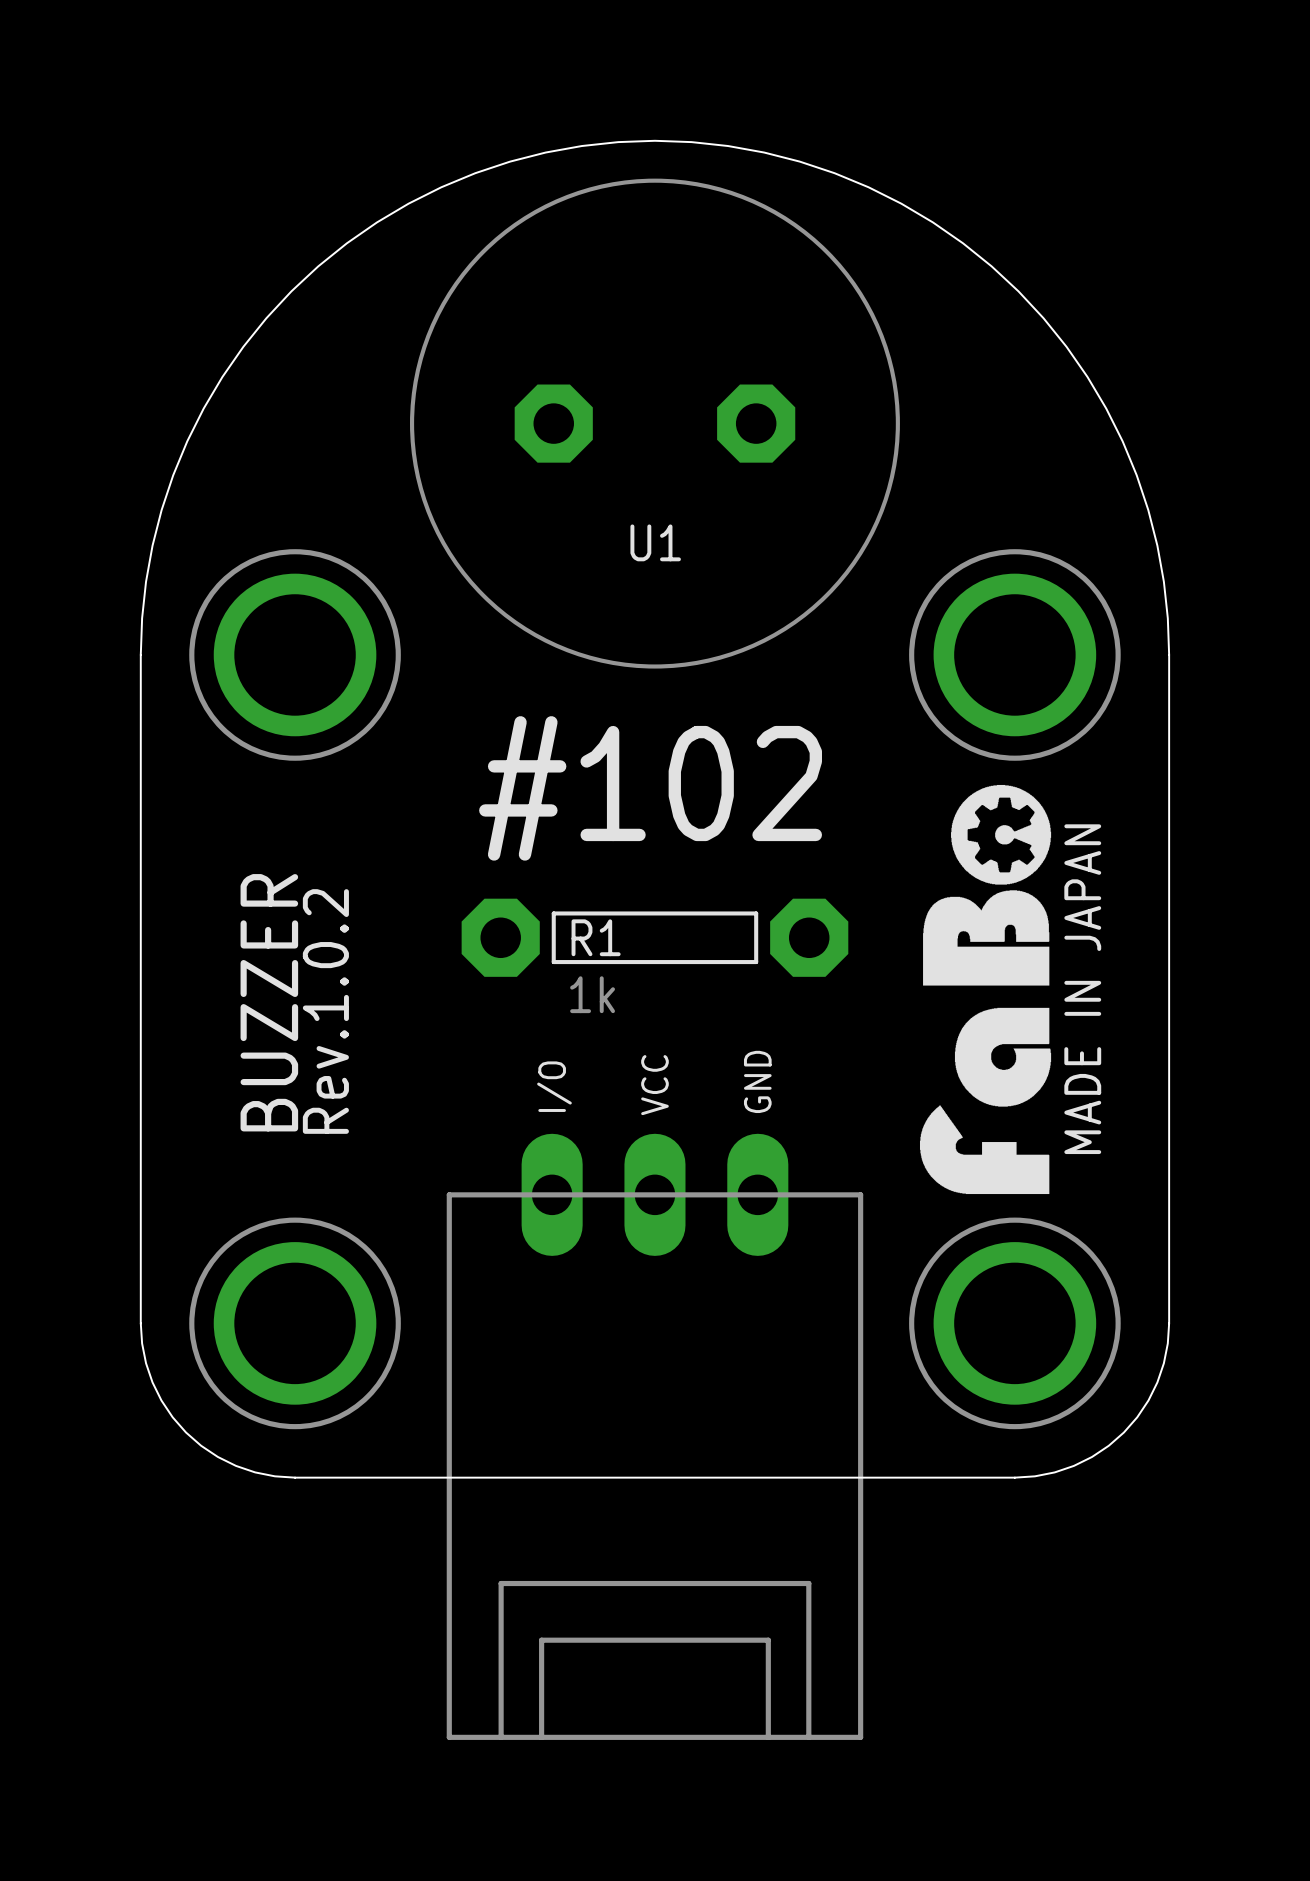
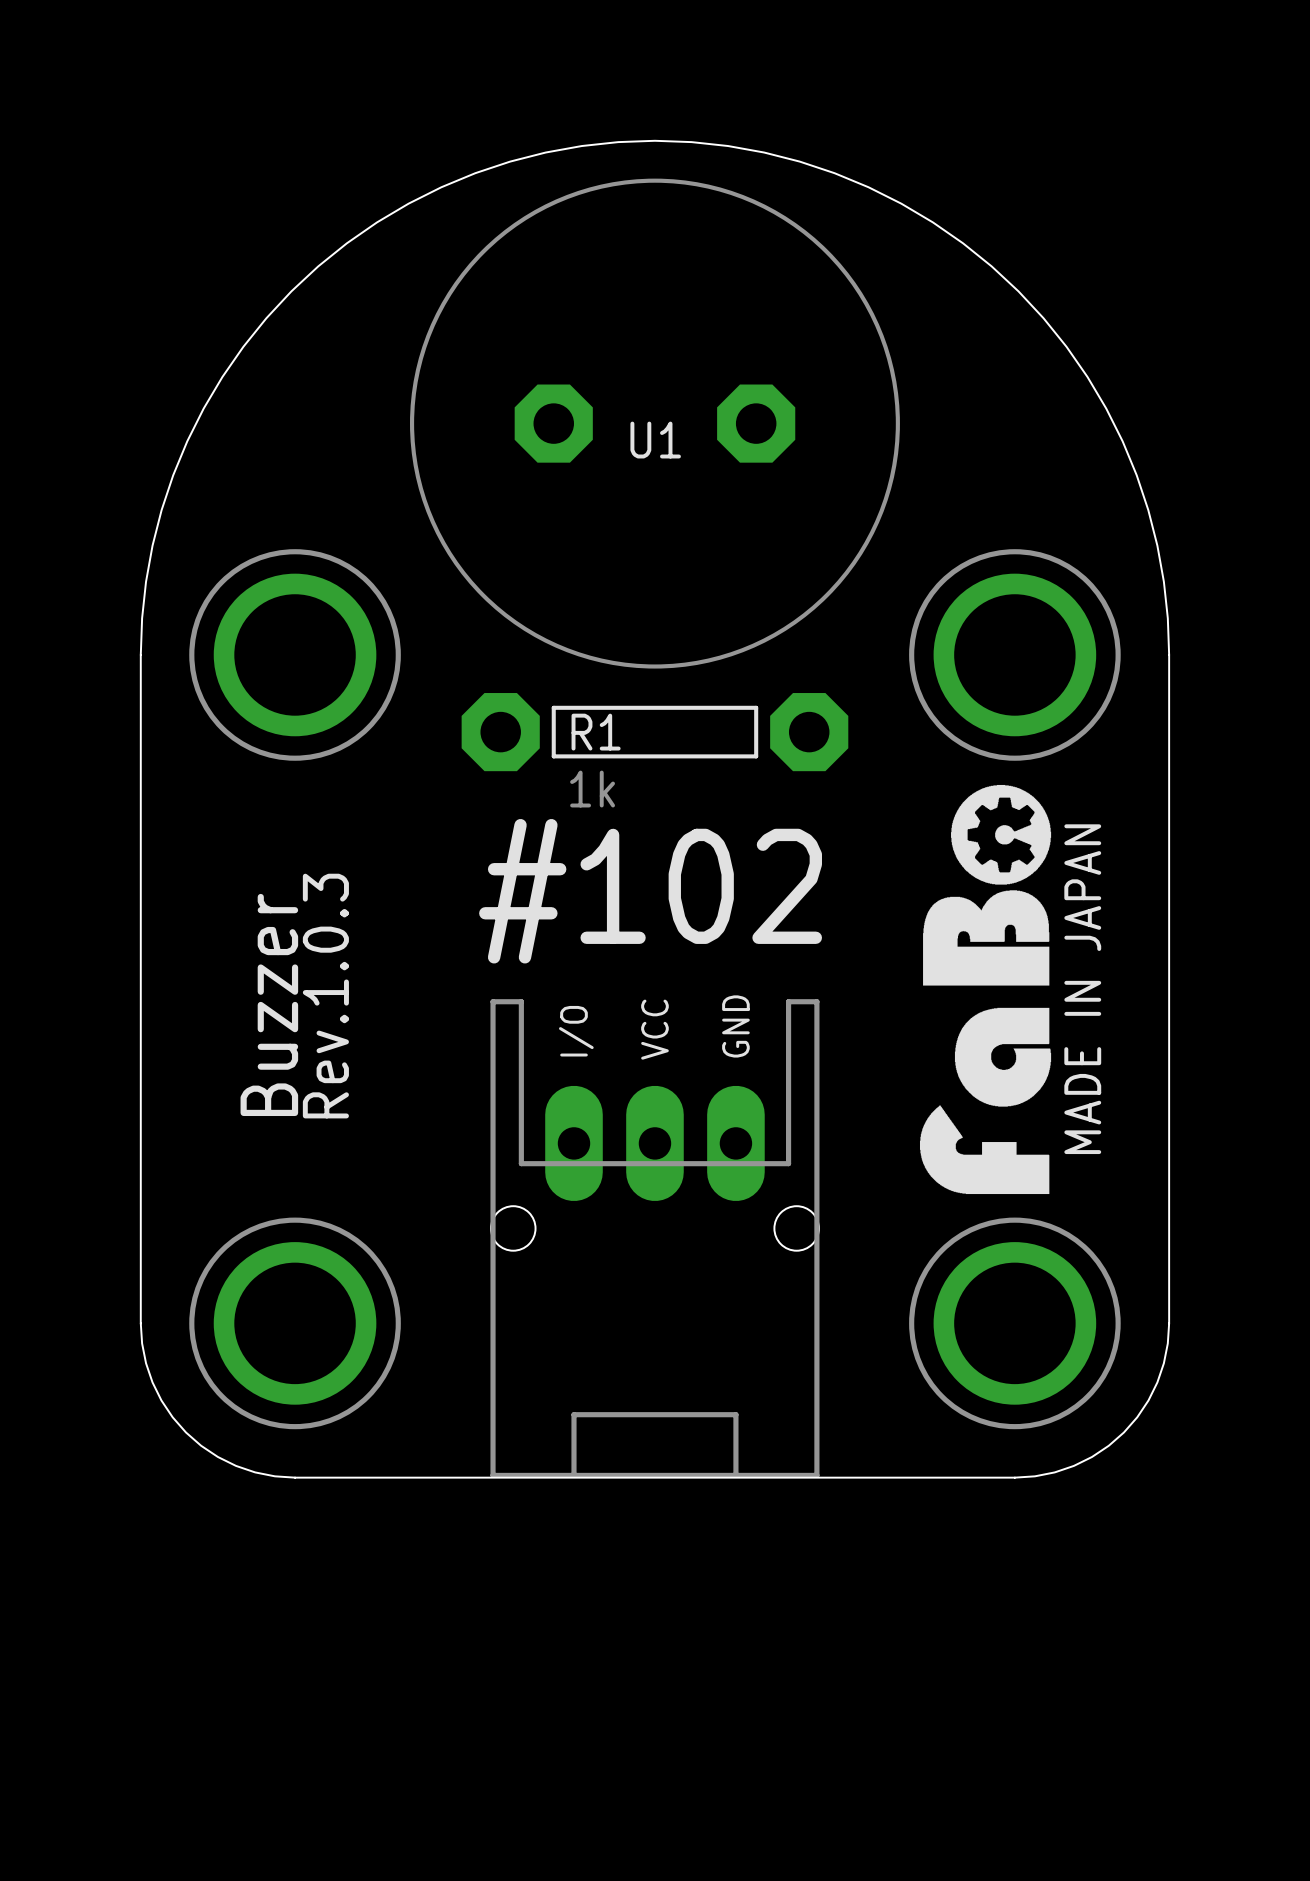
U1 name position: U1 (655, 542) -> U1 (655, 440)
text position: #102 (650, 788) -> #102 (650, 891)
part: none -> (654, 809)
R1 position: (654, 937) -> (654, 732)
part: (654, 940) -> none
text: BUZZER (269, 1002) -> Buzzer (269, 1004)
text: Rev.1.0.2 (325, 1011) -> Rev.1.0.3 (325, 996)

